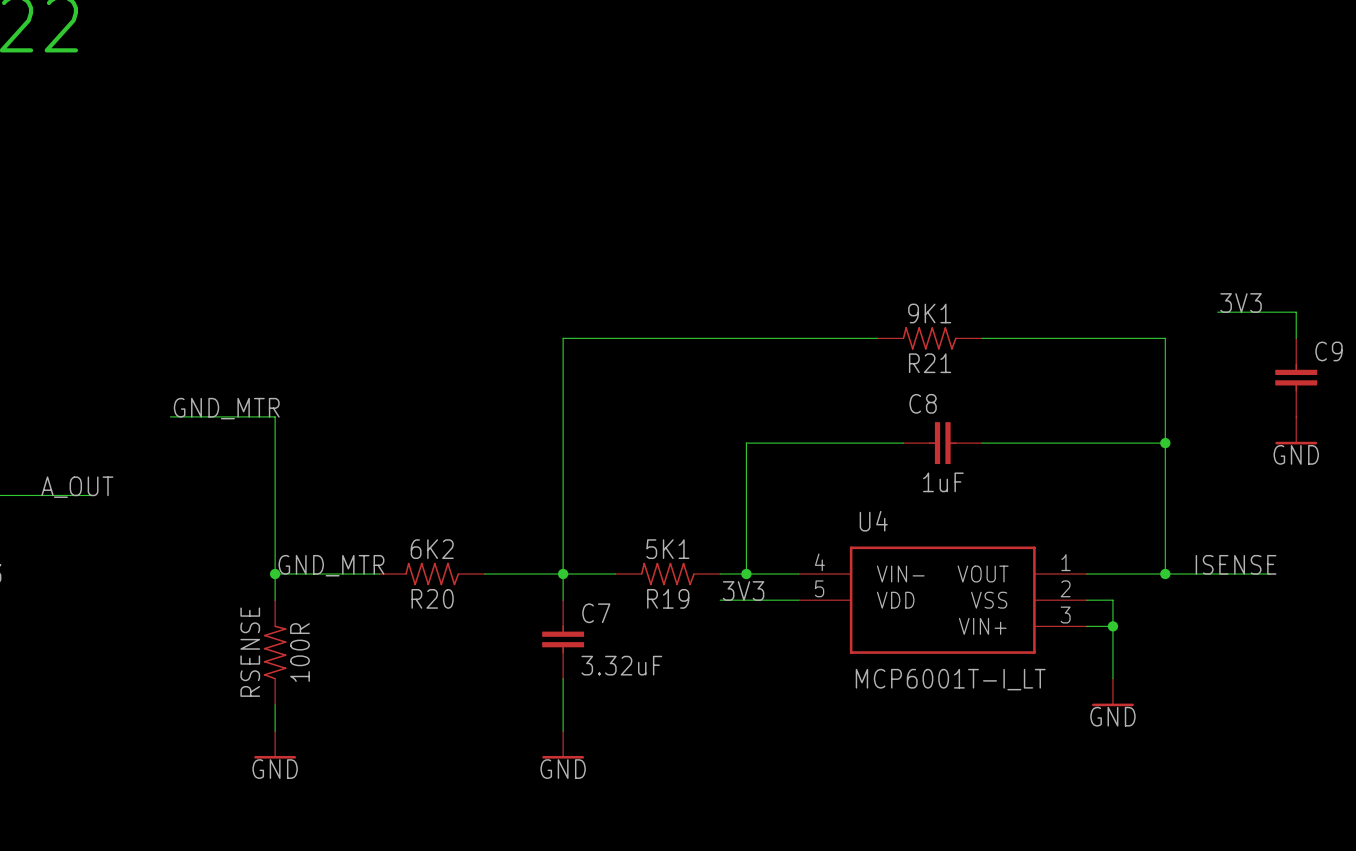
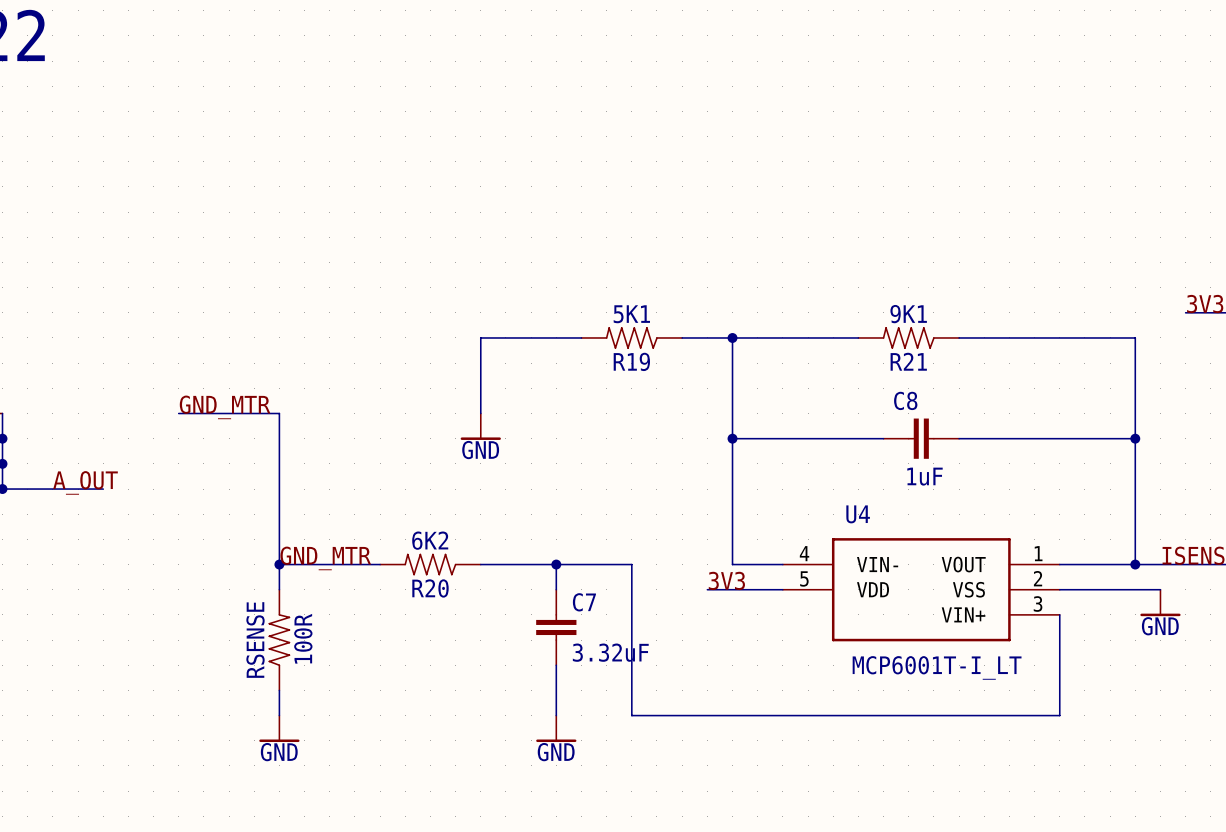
wire: (563, 338) (563, 574) -> (556, 337) (480, 337) (480, 413)
wire: none -> (732, 337) (732, 438)
junction: none -> (732, 337)
power symbol: none -> GND (480, 426)
junction: none -> (732, 438)
R19 position: (667, 574) -> (631, 337)
wire: (720, 574) (746, 574) -> none
junction: (746, 574) -> none
wire: (1112, 600) (1112, 678) -> (1084, 589) (1160, 589)
wire: (1086, 626) (1112, 626) -> (1059, 614) (1059, 715) (631, 715) (631, 564) (606, 564)
junction: (1112, 626) -> none
power symbol position: GND (1112, 692) -> GND (1160, 602)

